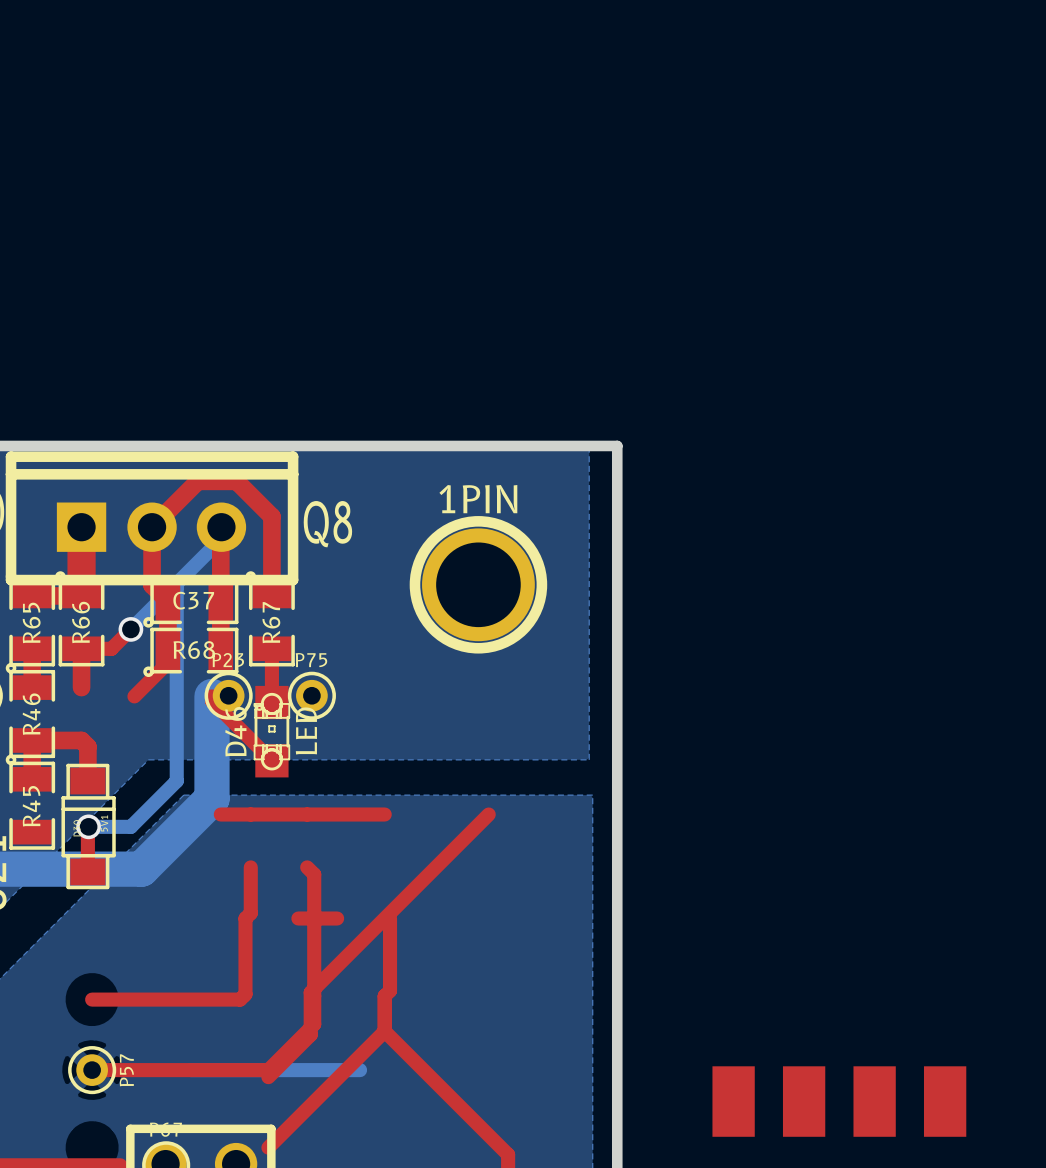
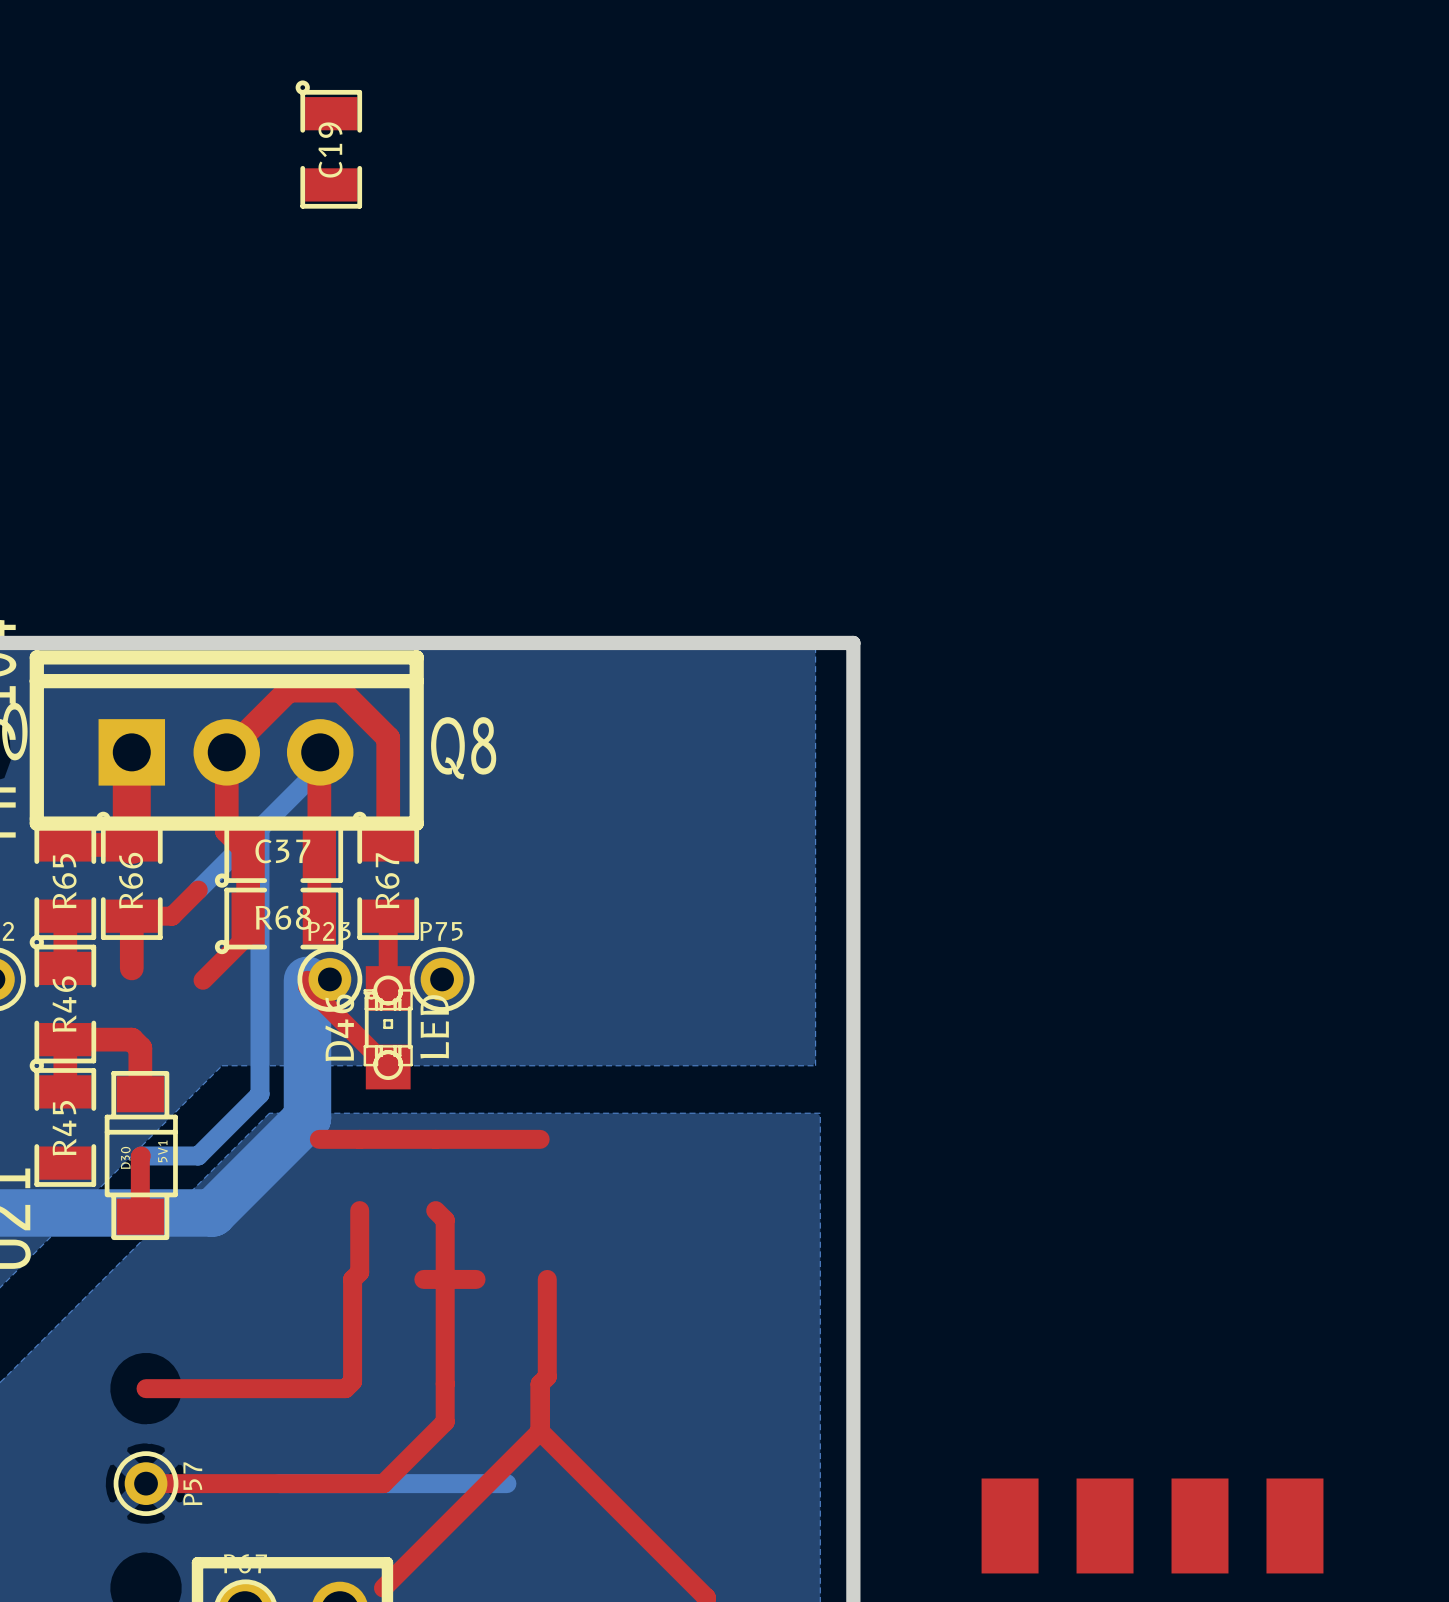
C19: none -> (328, 144)
1PIN: (478, 584) -> none
via: (130, 629) -> none
top track: (488, 814) (310, 992) (310, 1034) (268, 1077) -> none
via: (88, 826) -> none

